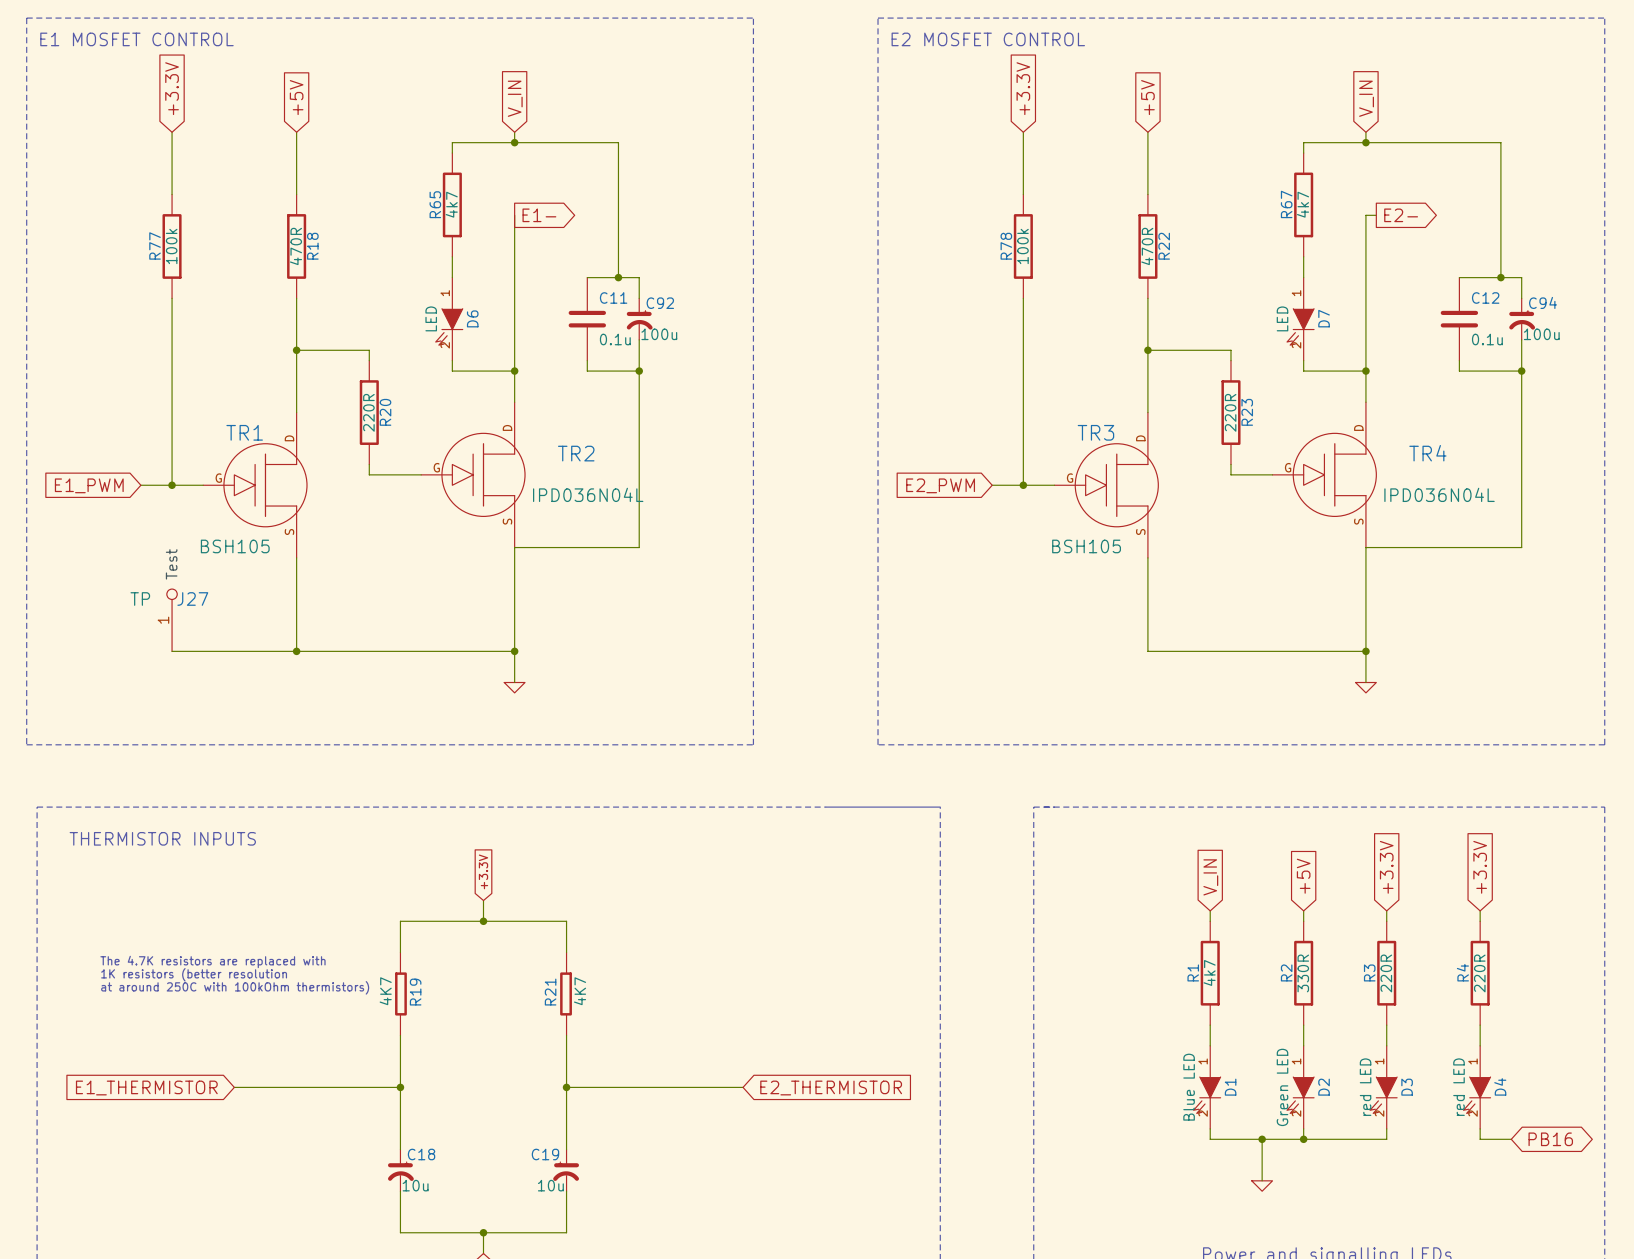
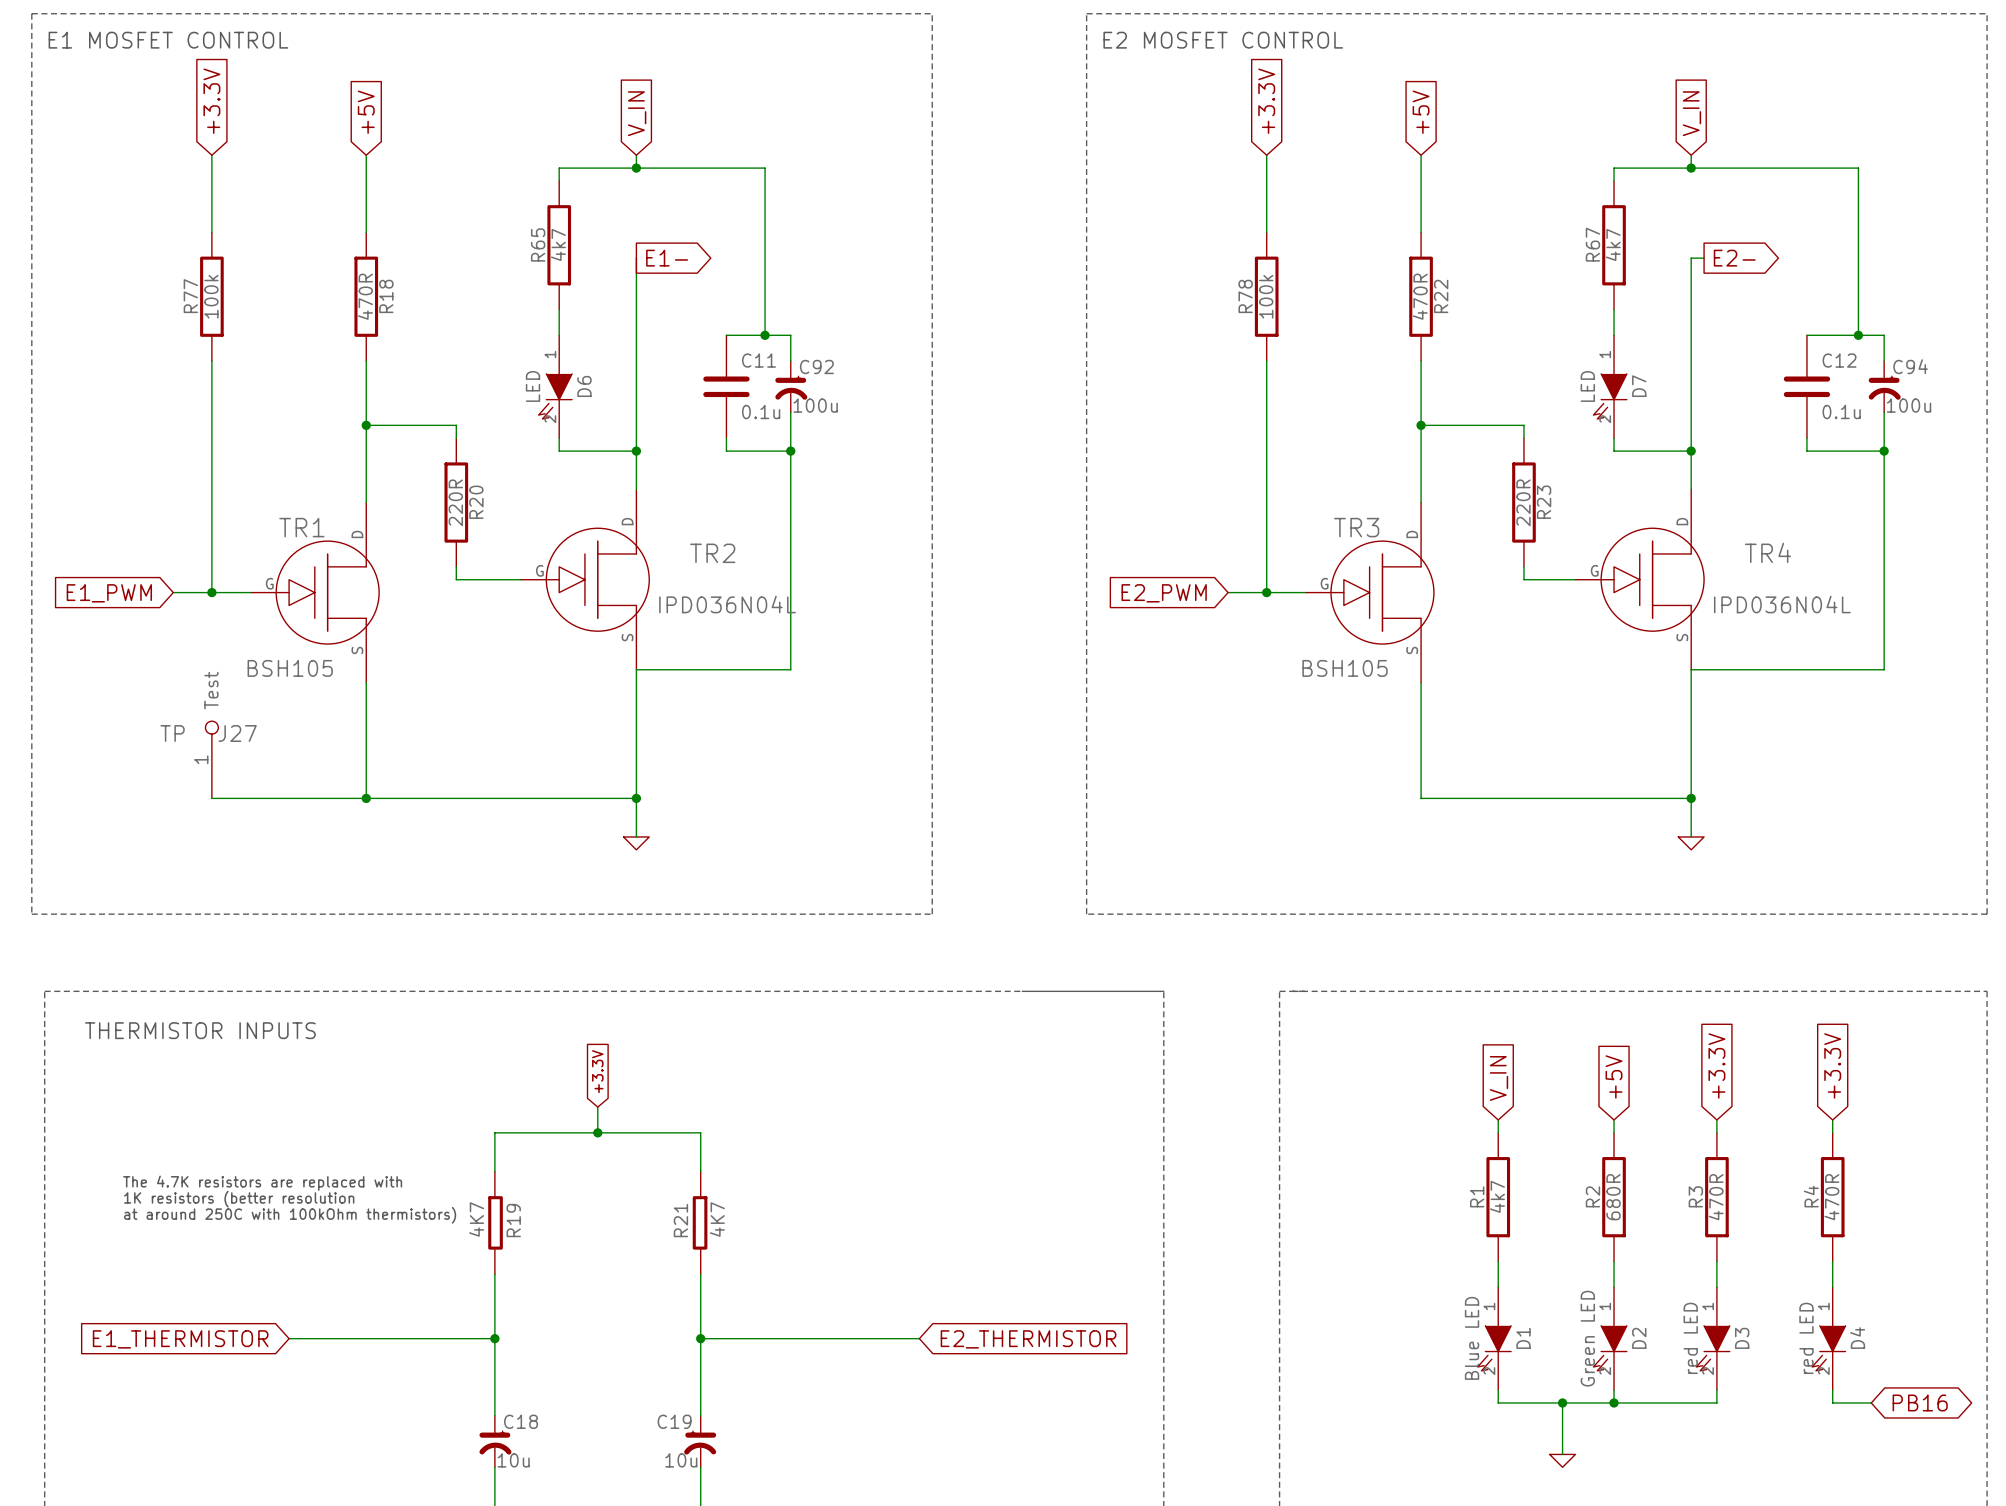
R2 value: 330R (1303, 973) -> 680R (1613, 1197)
R3 value: 220R (1386, 973) -> 470R (1716, 1197)
R4 value: 220R (1479, 973) -> 470R (1831, 1197)

